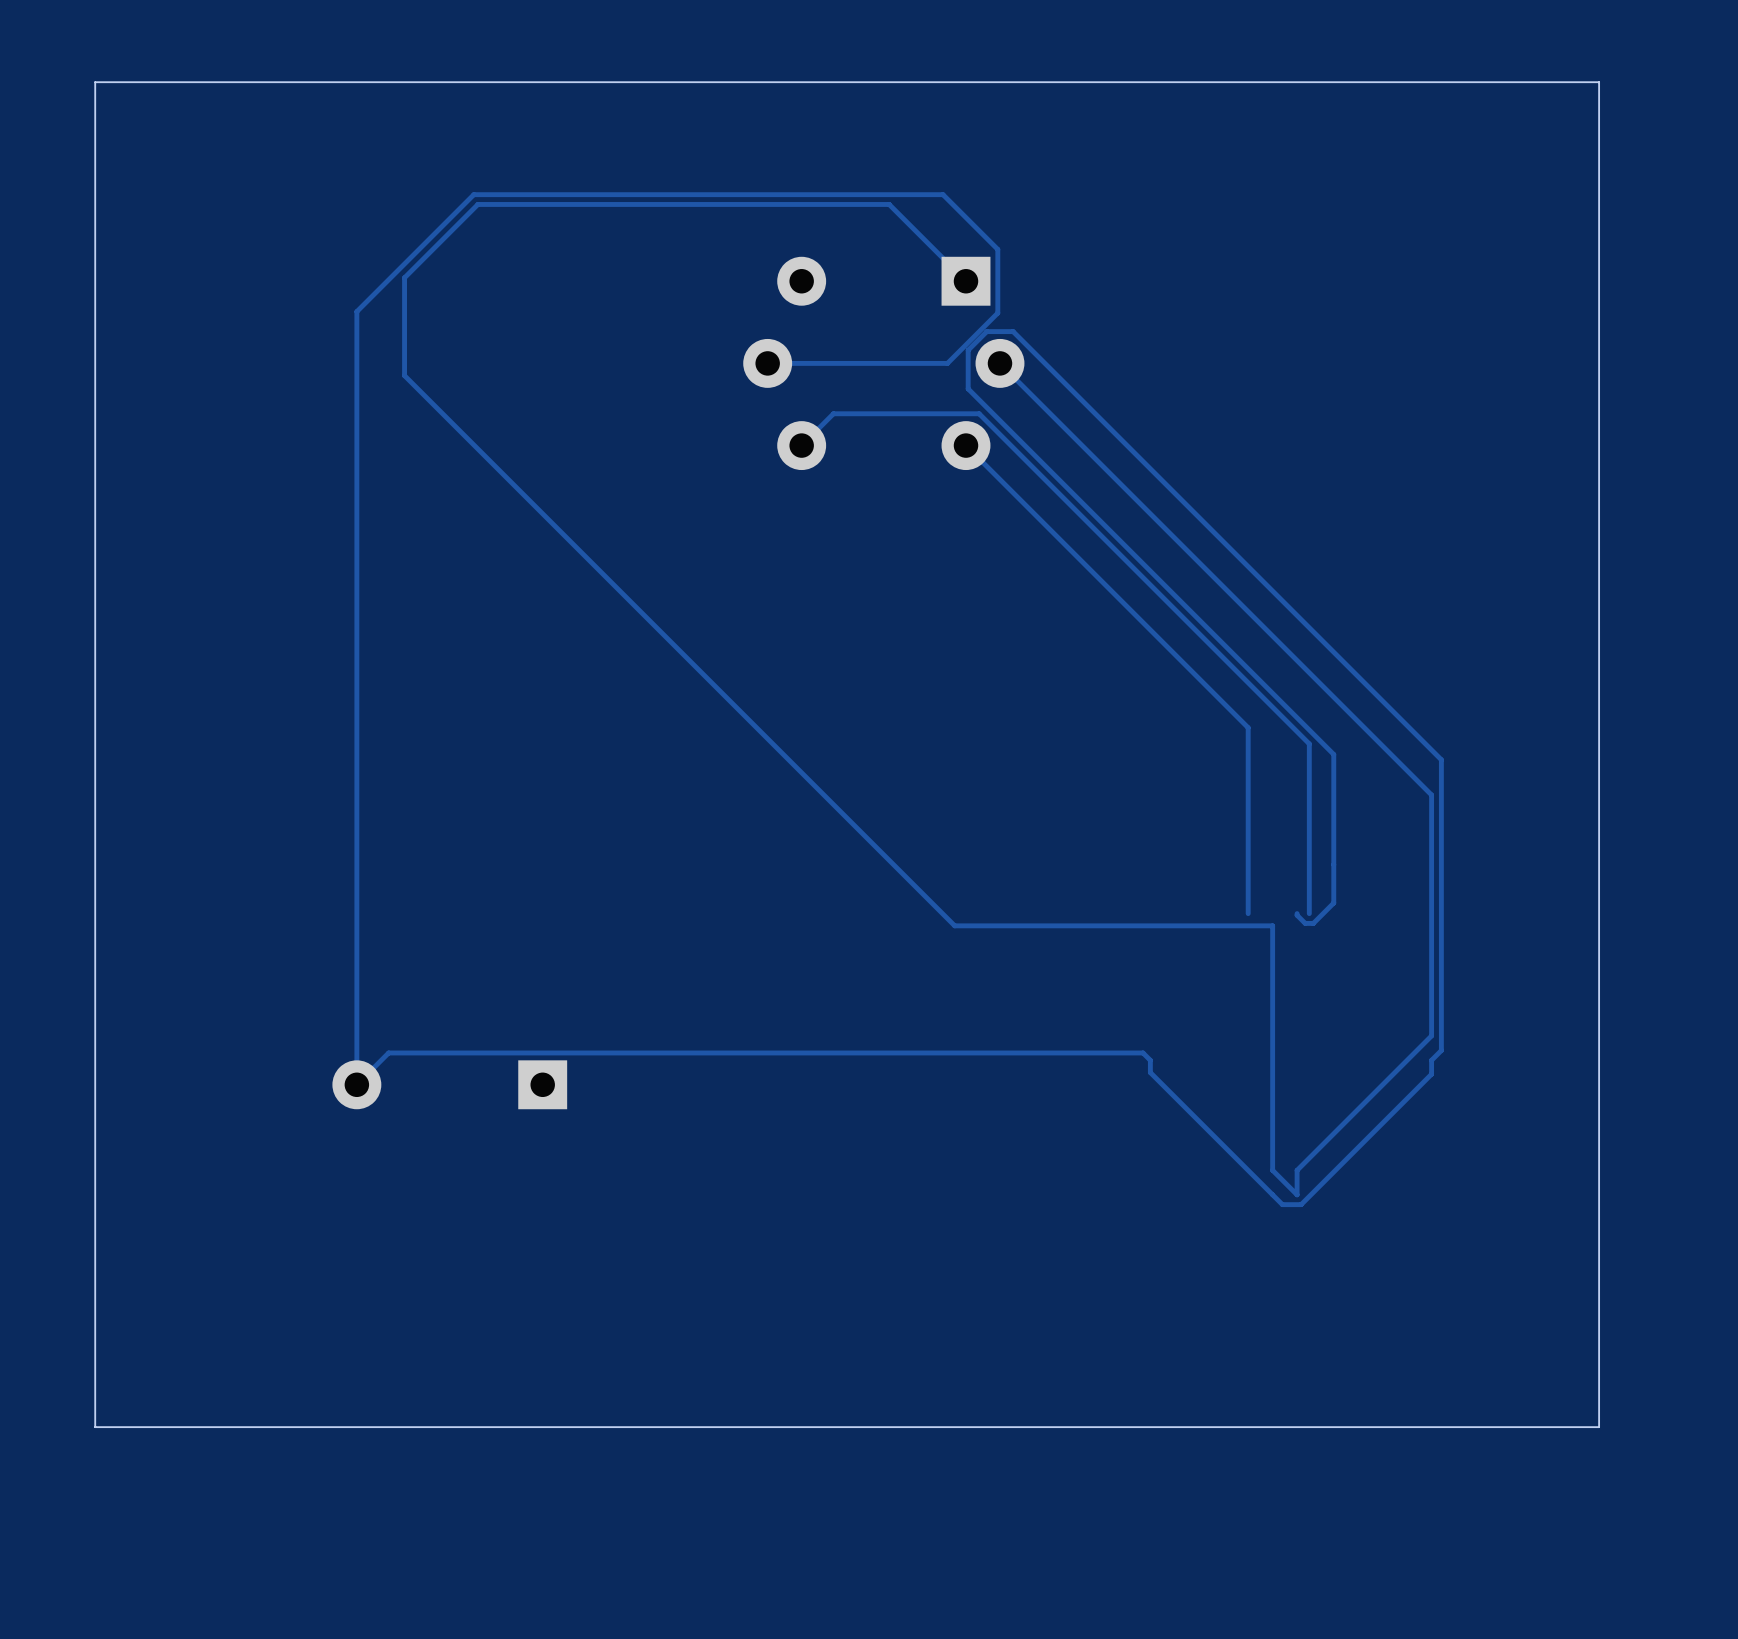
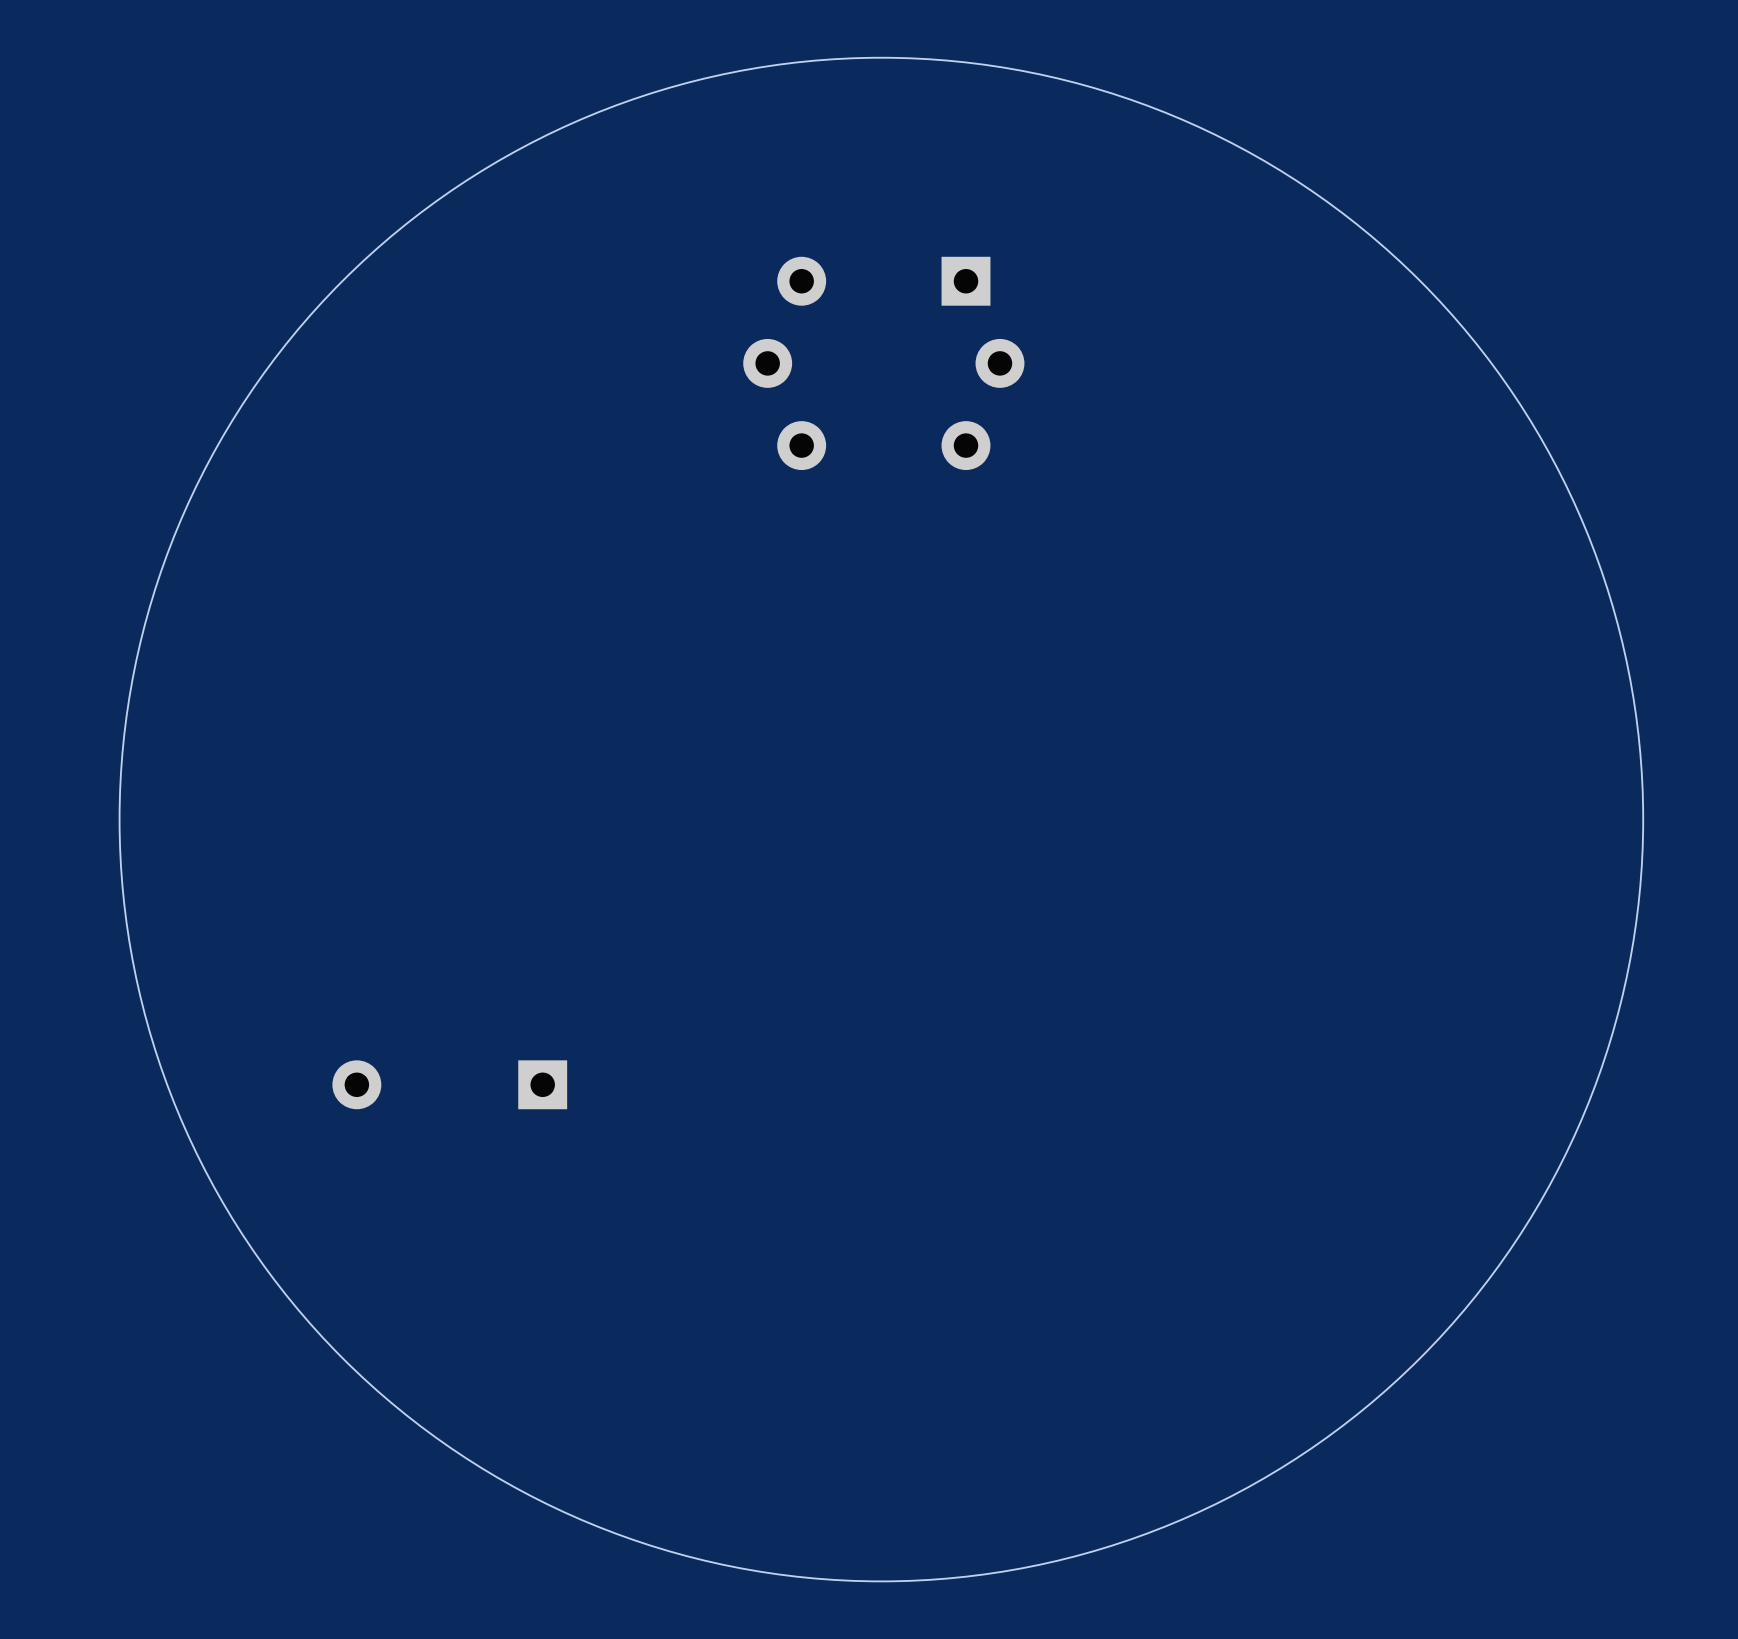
round board edge: none -> [118, 57, 1644, 1583]
board edge: (1599, 82) (95, 82) (95, 1427) (1599, 1427) (1599, 82) -> none
track: (965, 281) (889, 204) (477, 204) (404, 277) (404, 375) (954, 925) (1272, 925) (1272, 1170) (1297, 1194) (1297, 1170) (1431, 1035) (1431, 795) (999, 363) -> none
track: (767, 363) (947, 363) (997, 313) (997, 249) (943, 194) (473, 194) (356, 311) (356, 1084) (388, 1052) (1143, 1052) (1150, 1060) (1150, 1072) (1282, 1204) (1301, 1204) (1431, 1074) (1431, 1060) (1441, 1050) (1441, 759) (1013, 331) (986, 331) (968, 350) (968, 388) (1333, 754) (1333, 903) (1313, 923) (1305, 923) (1297, 913) -> none
track: (801, 445) (833, 413) (979, 413) (1309, 743) (1309, 913) -> none
track: (965, 445) (1248, 727) (1248, 913) -> none

